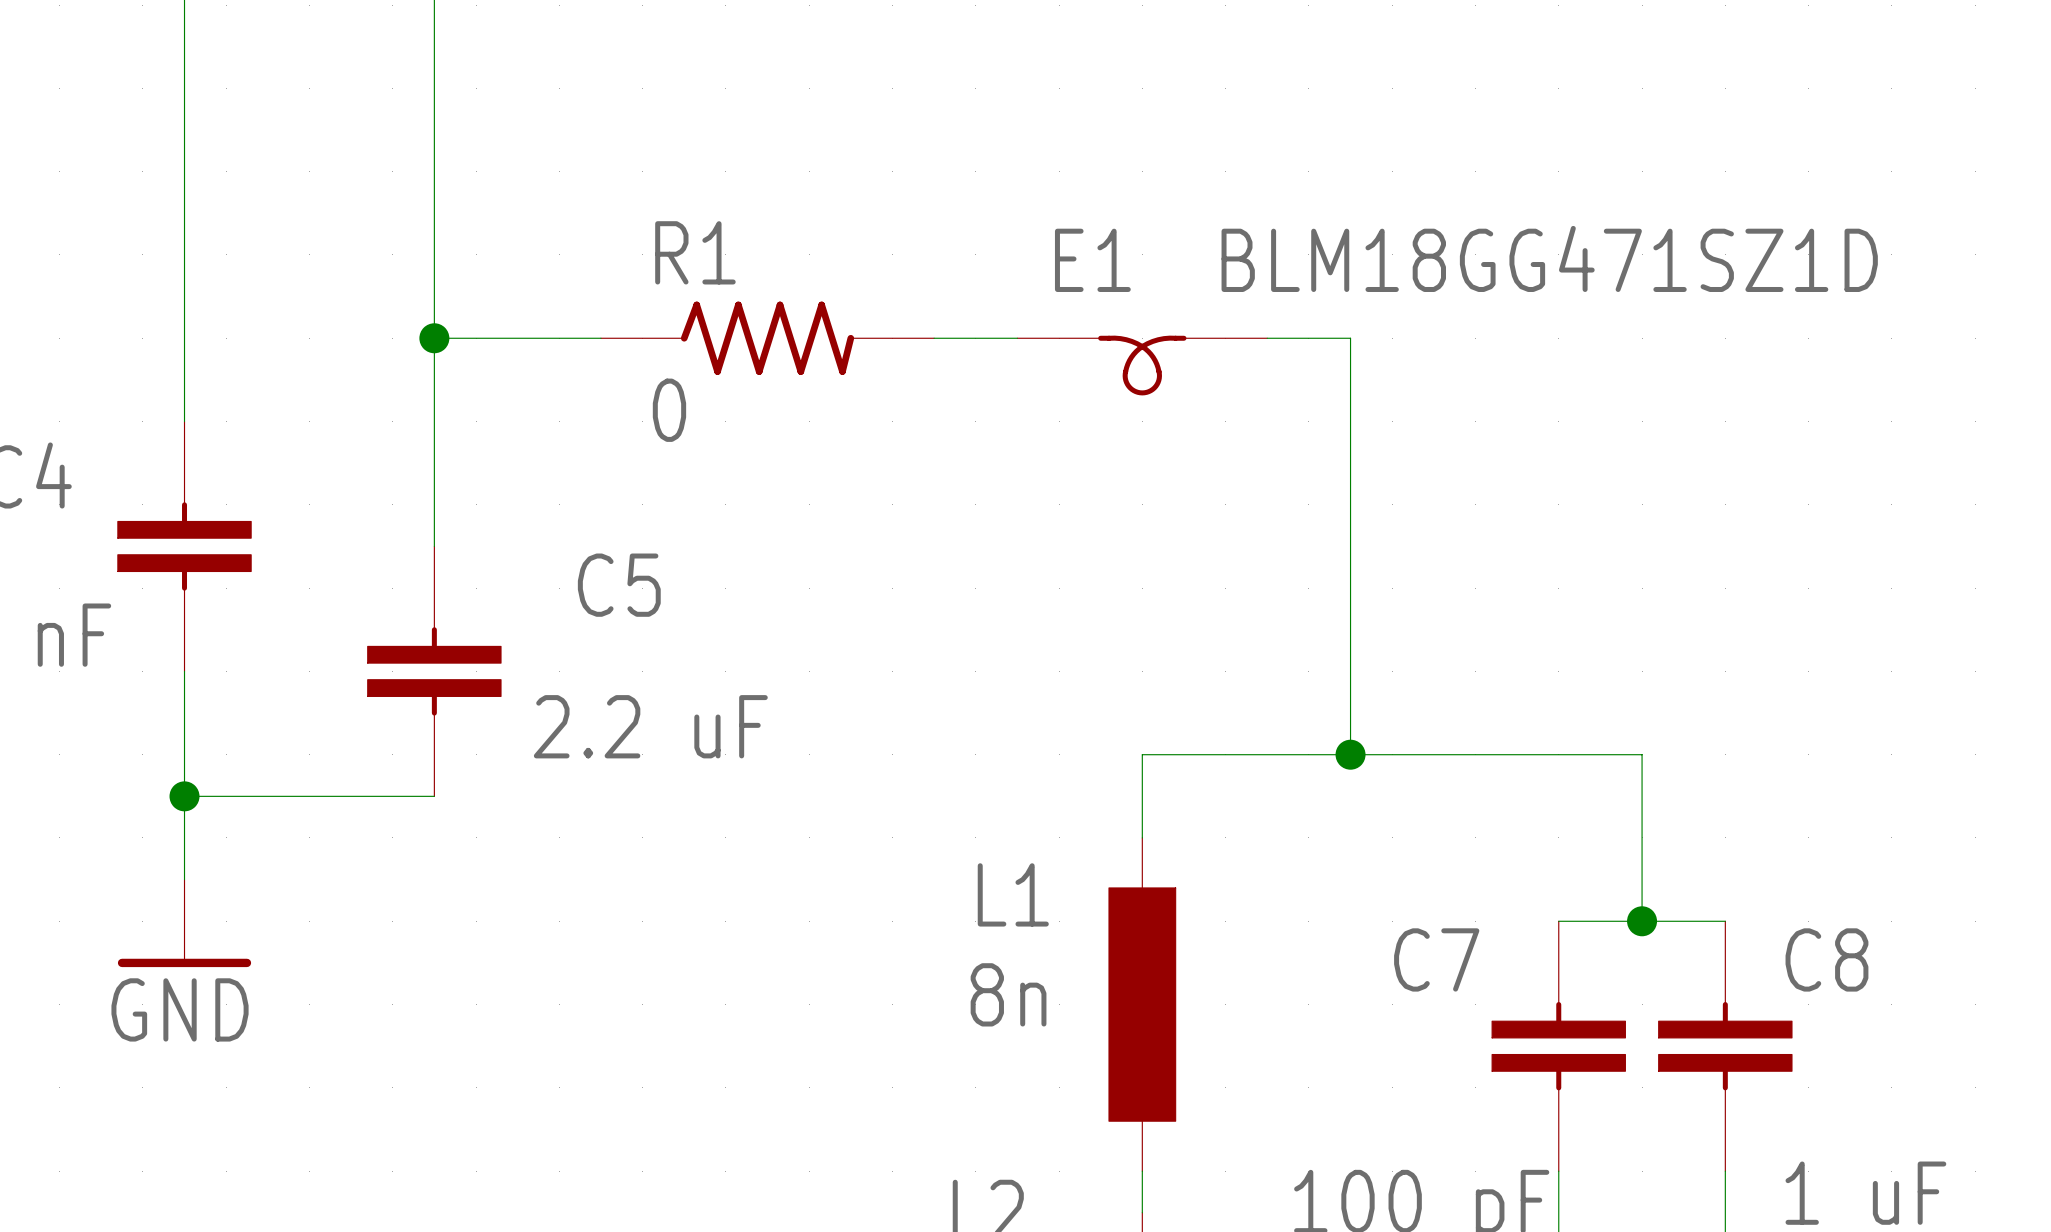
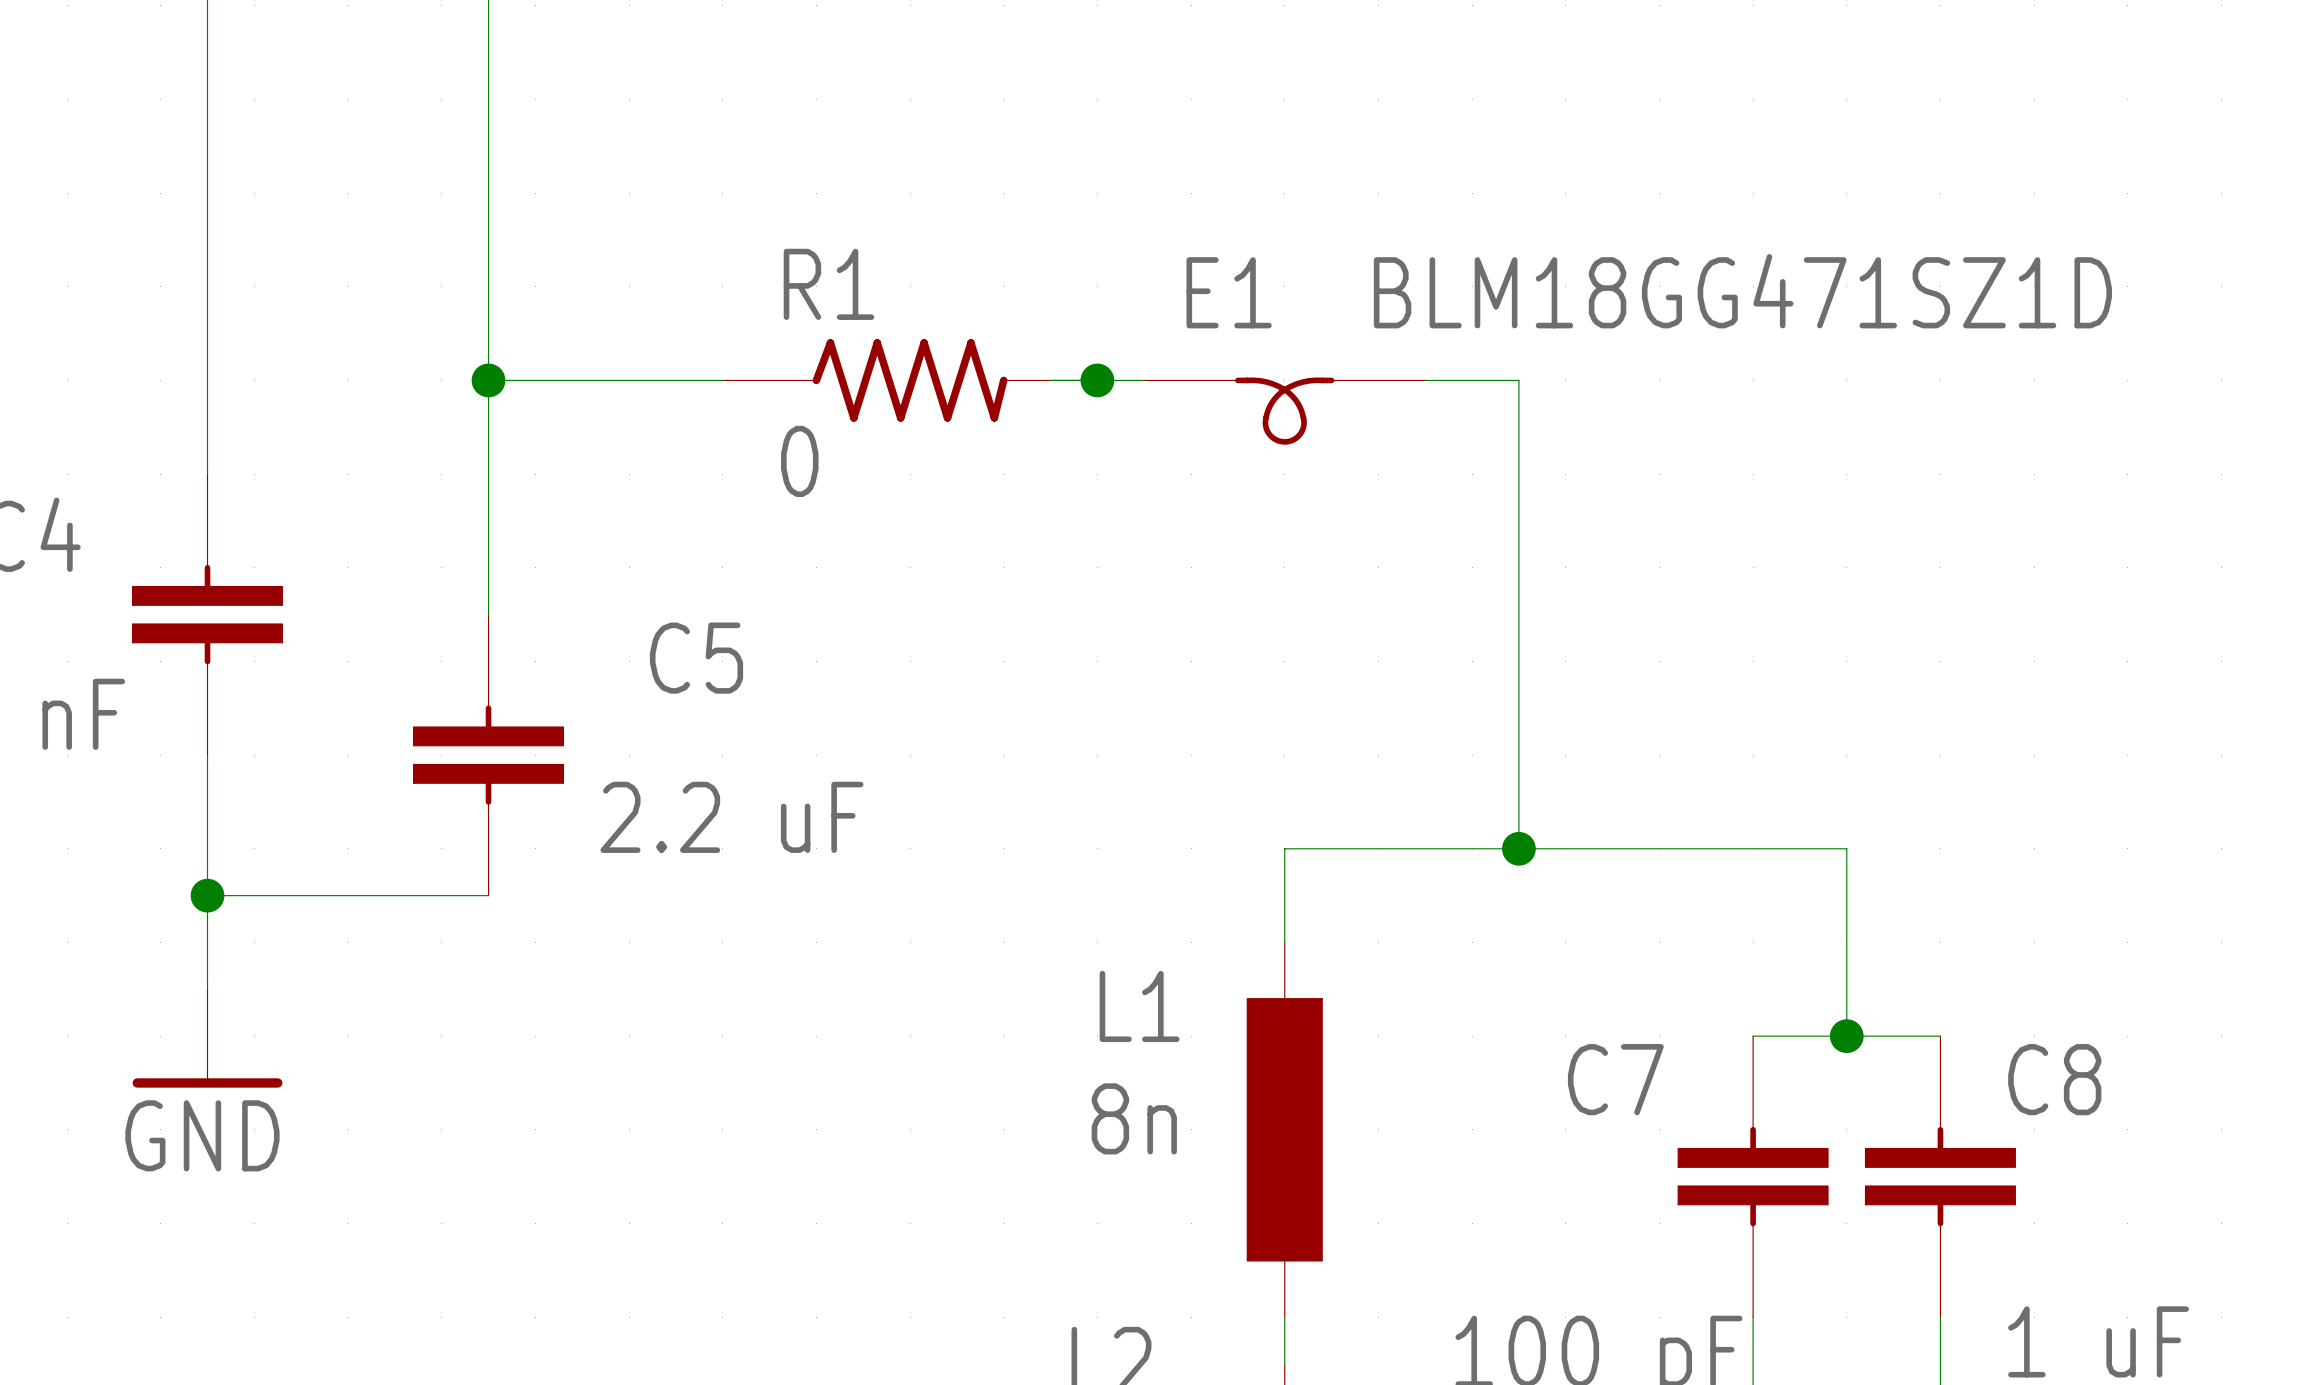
R1 position: (767, 338) -> (910, 380)
junction: none -> (1097, 380)

